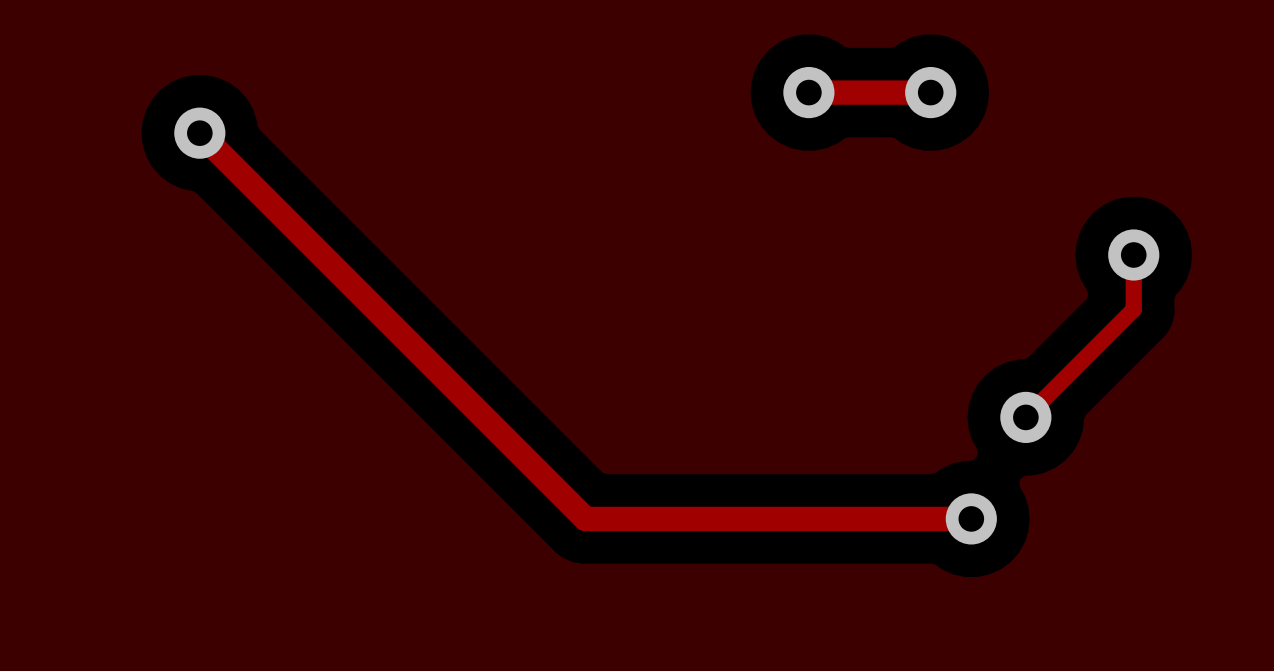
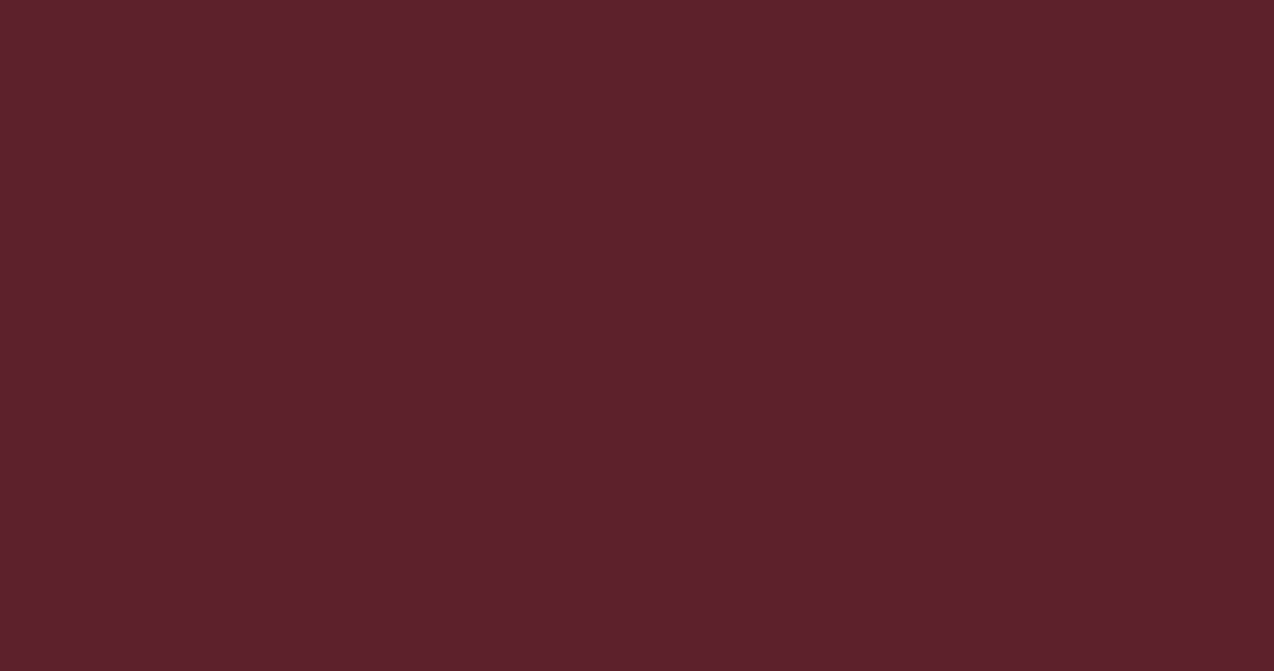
track: (808, 92) (930, 92) -> none
via: (808, 92) -> none
via: (930, 92) -> none
track: (199, 133) (585, 518) (971, 518) -> none
via: (199, 133) -> none
track: (1133, 254) (1133, 309) (1025, 417) -> none
via: (1133, 254) -> none
via: (1025, 417) -> none
via: (971, 518) -> none

